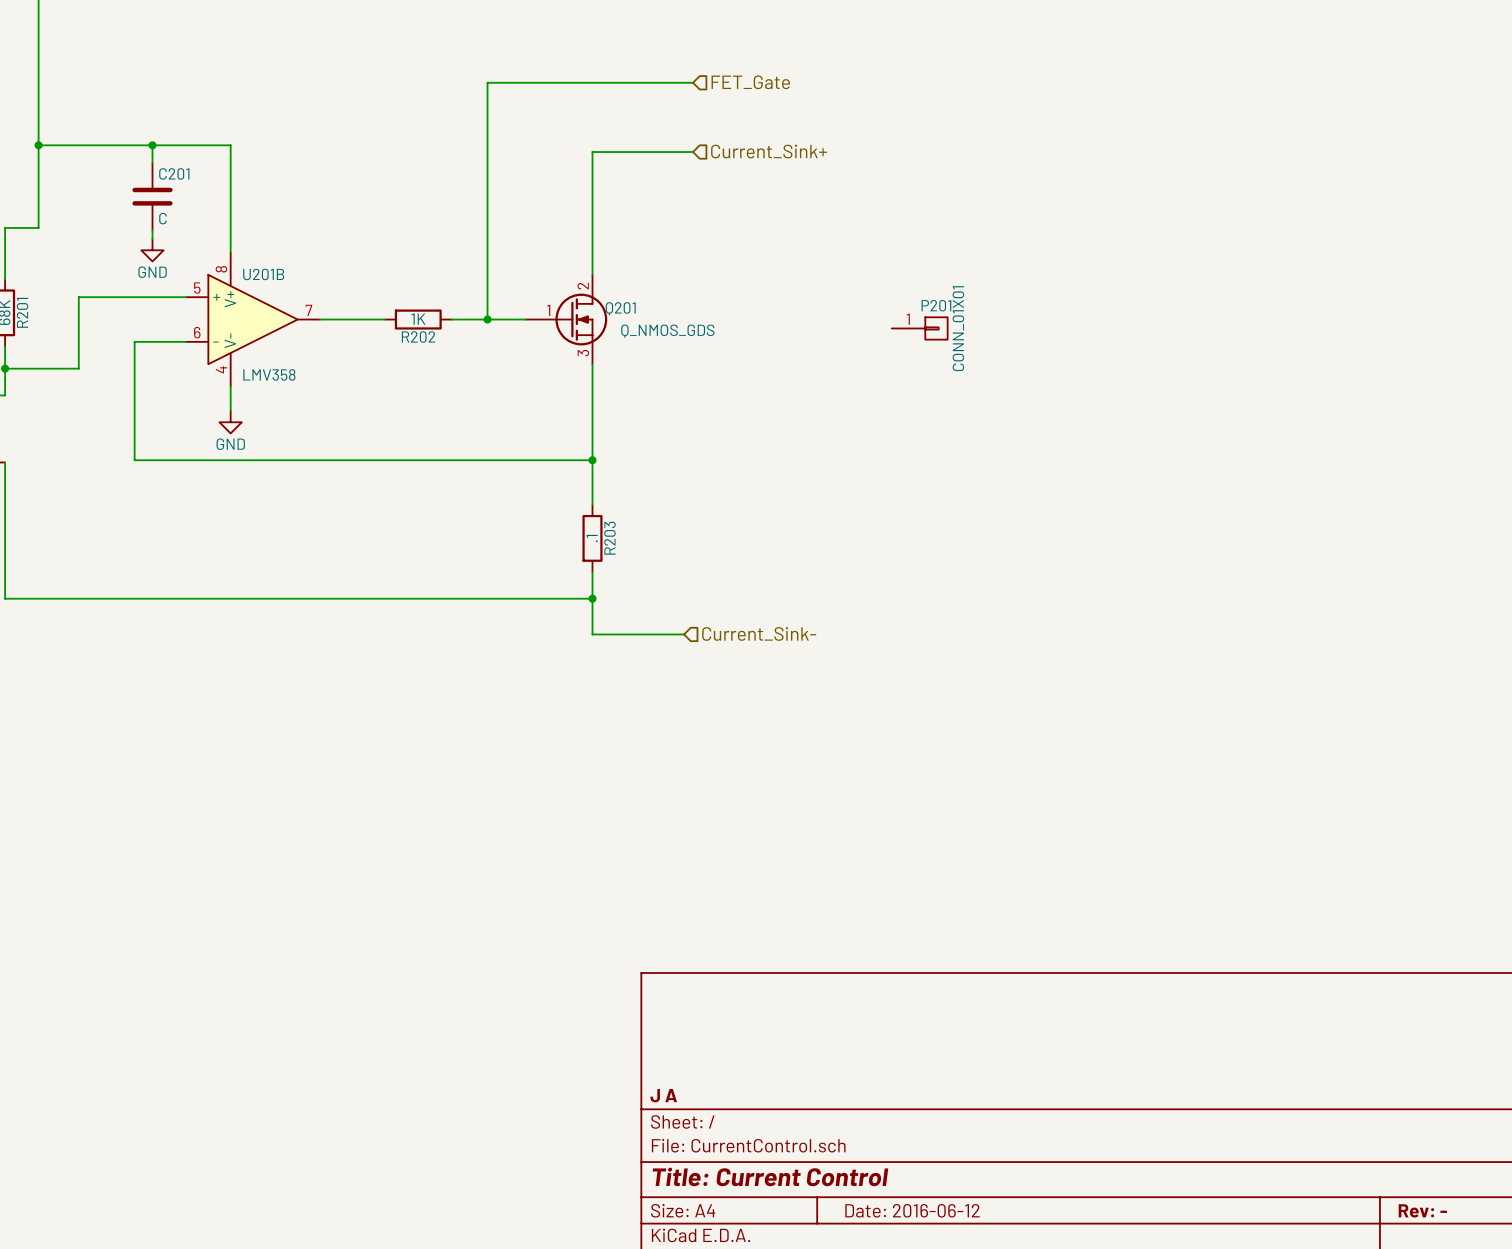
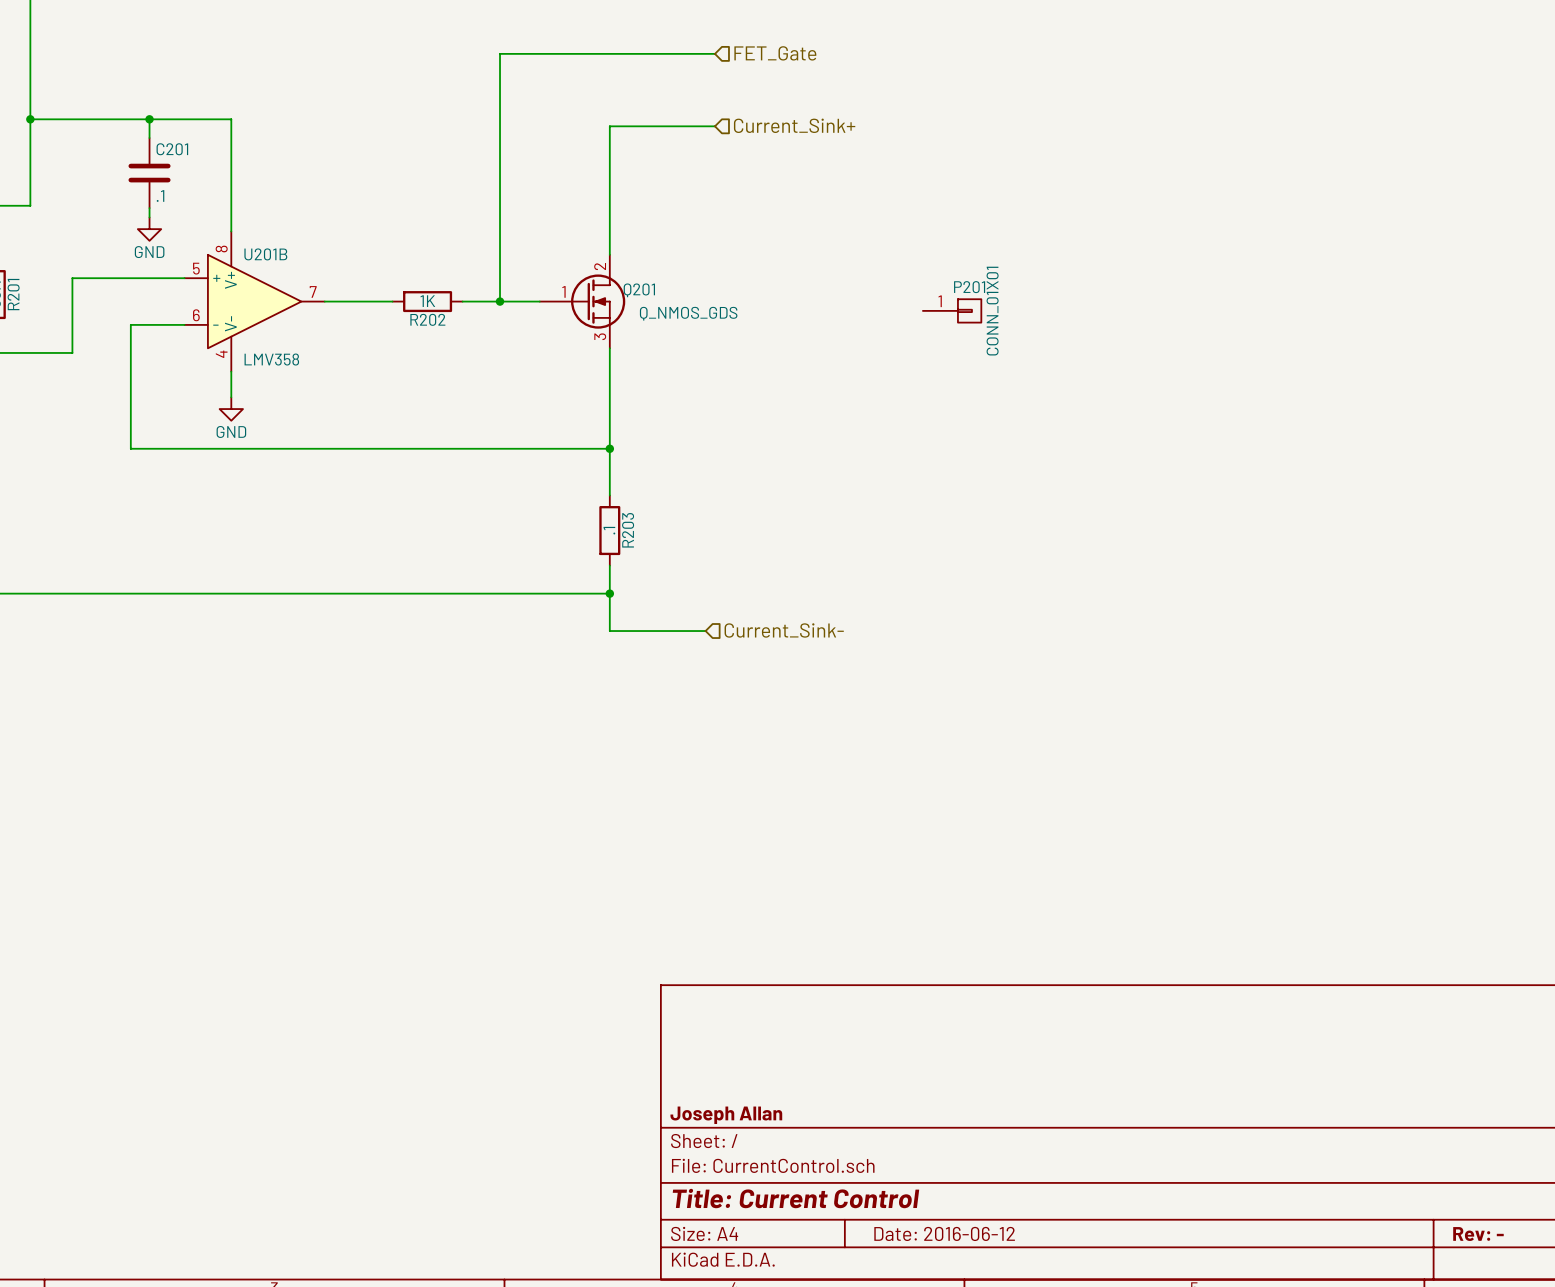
C201 value: C (162, 218) -> .1 (160, 196)
title block: J A (663, 1095) -> Joseph Allan (726, 1115)

